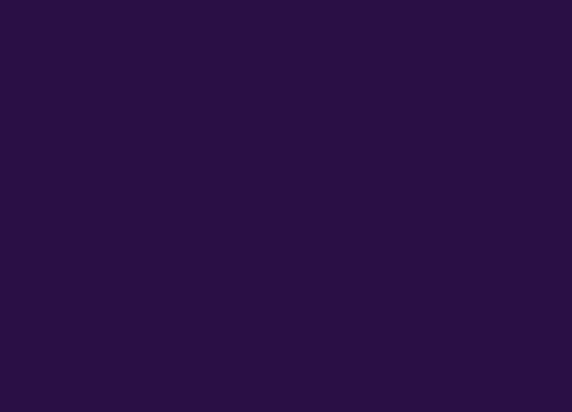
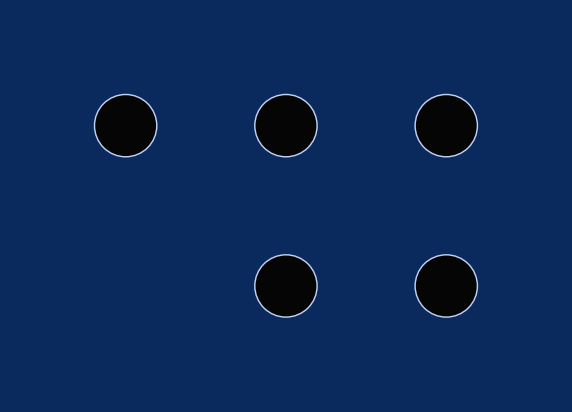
part: none -> (125, 125)
part: none -> (285, 125)
part: none -> (446, 125)
part: none -> (285, 285)
part: none -> (446, 285)

